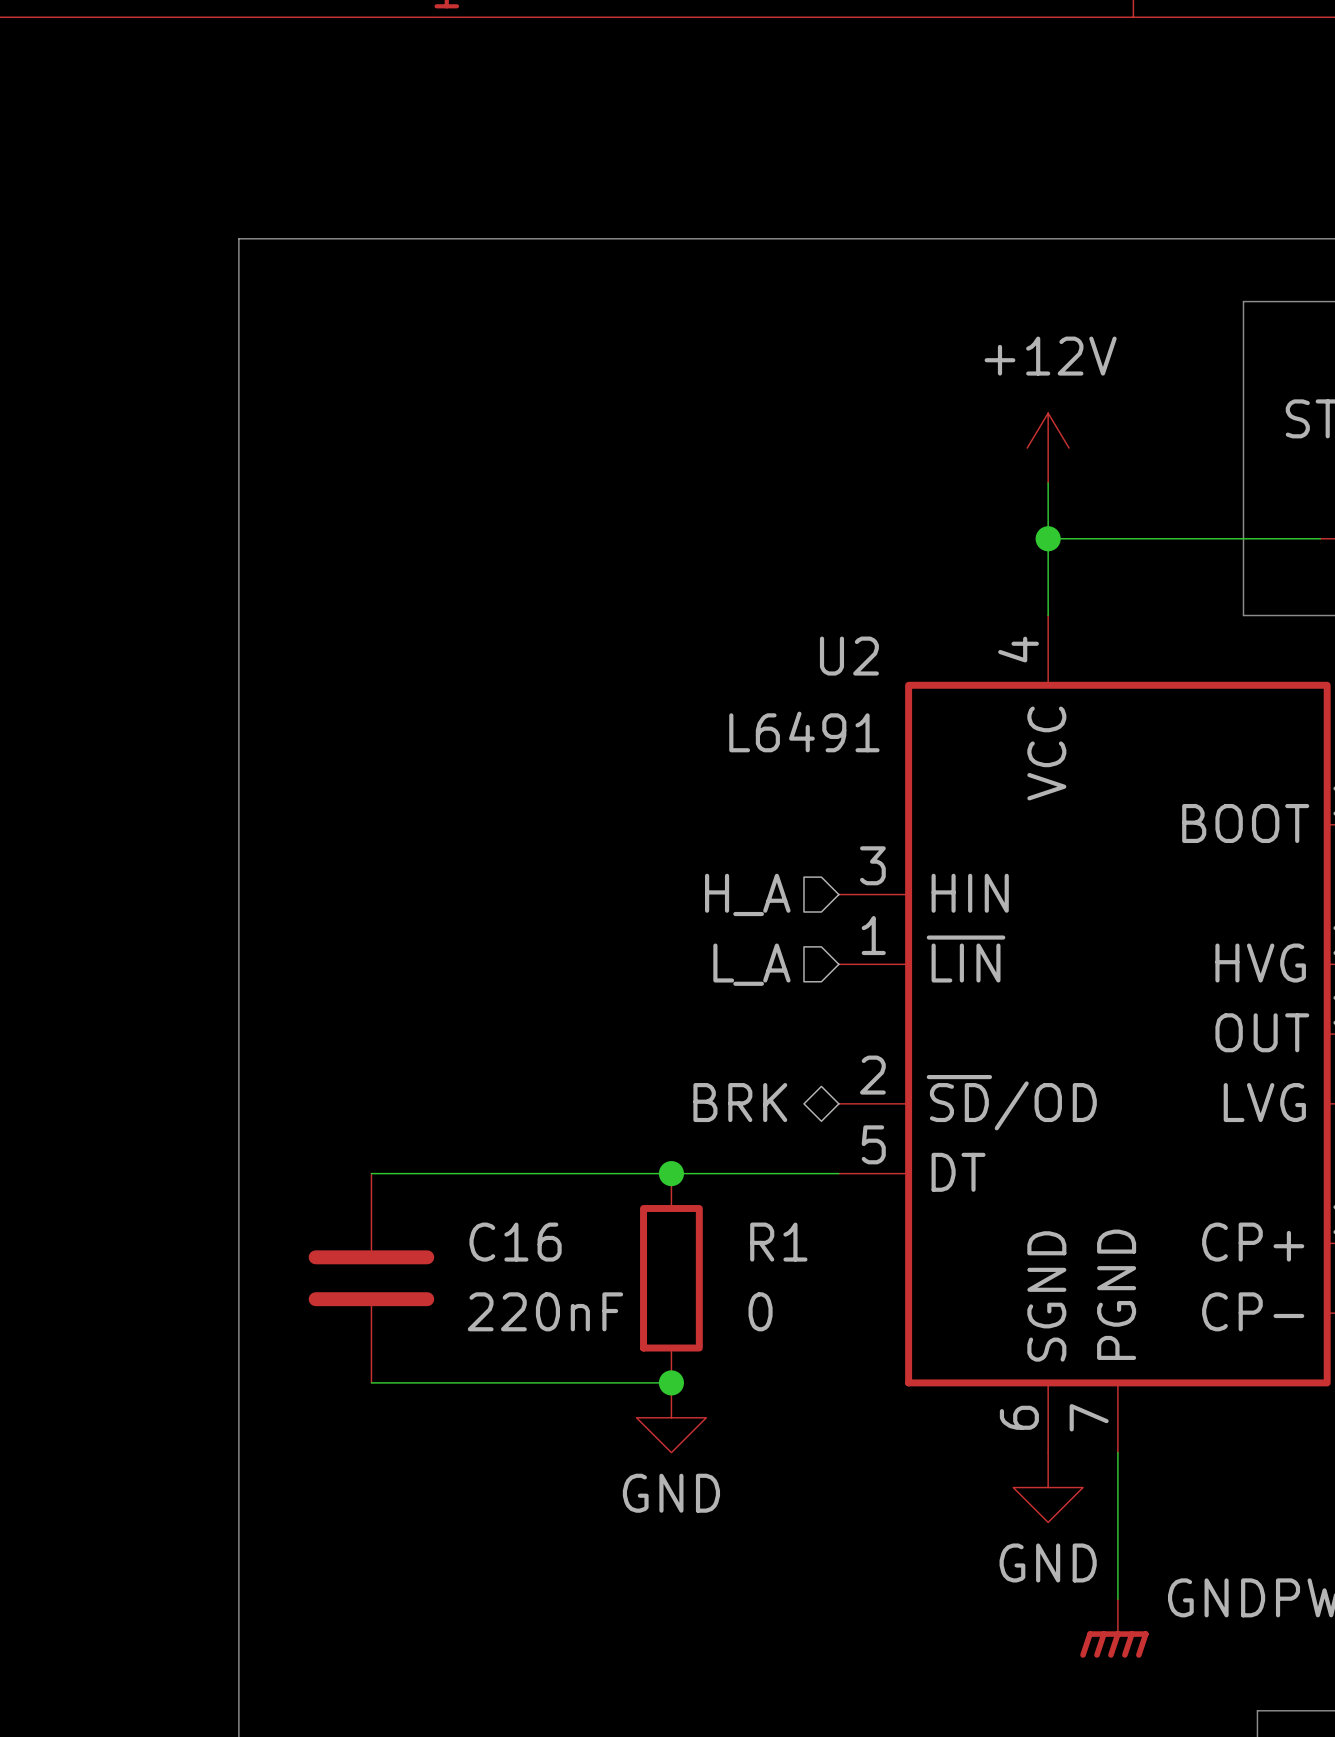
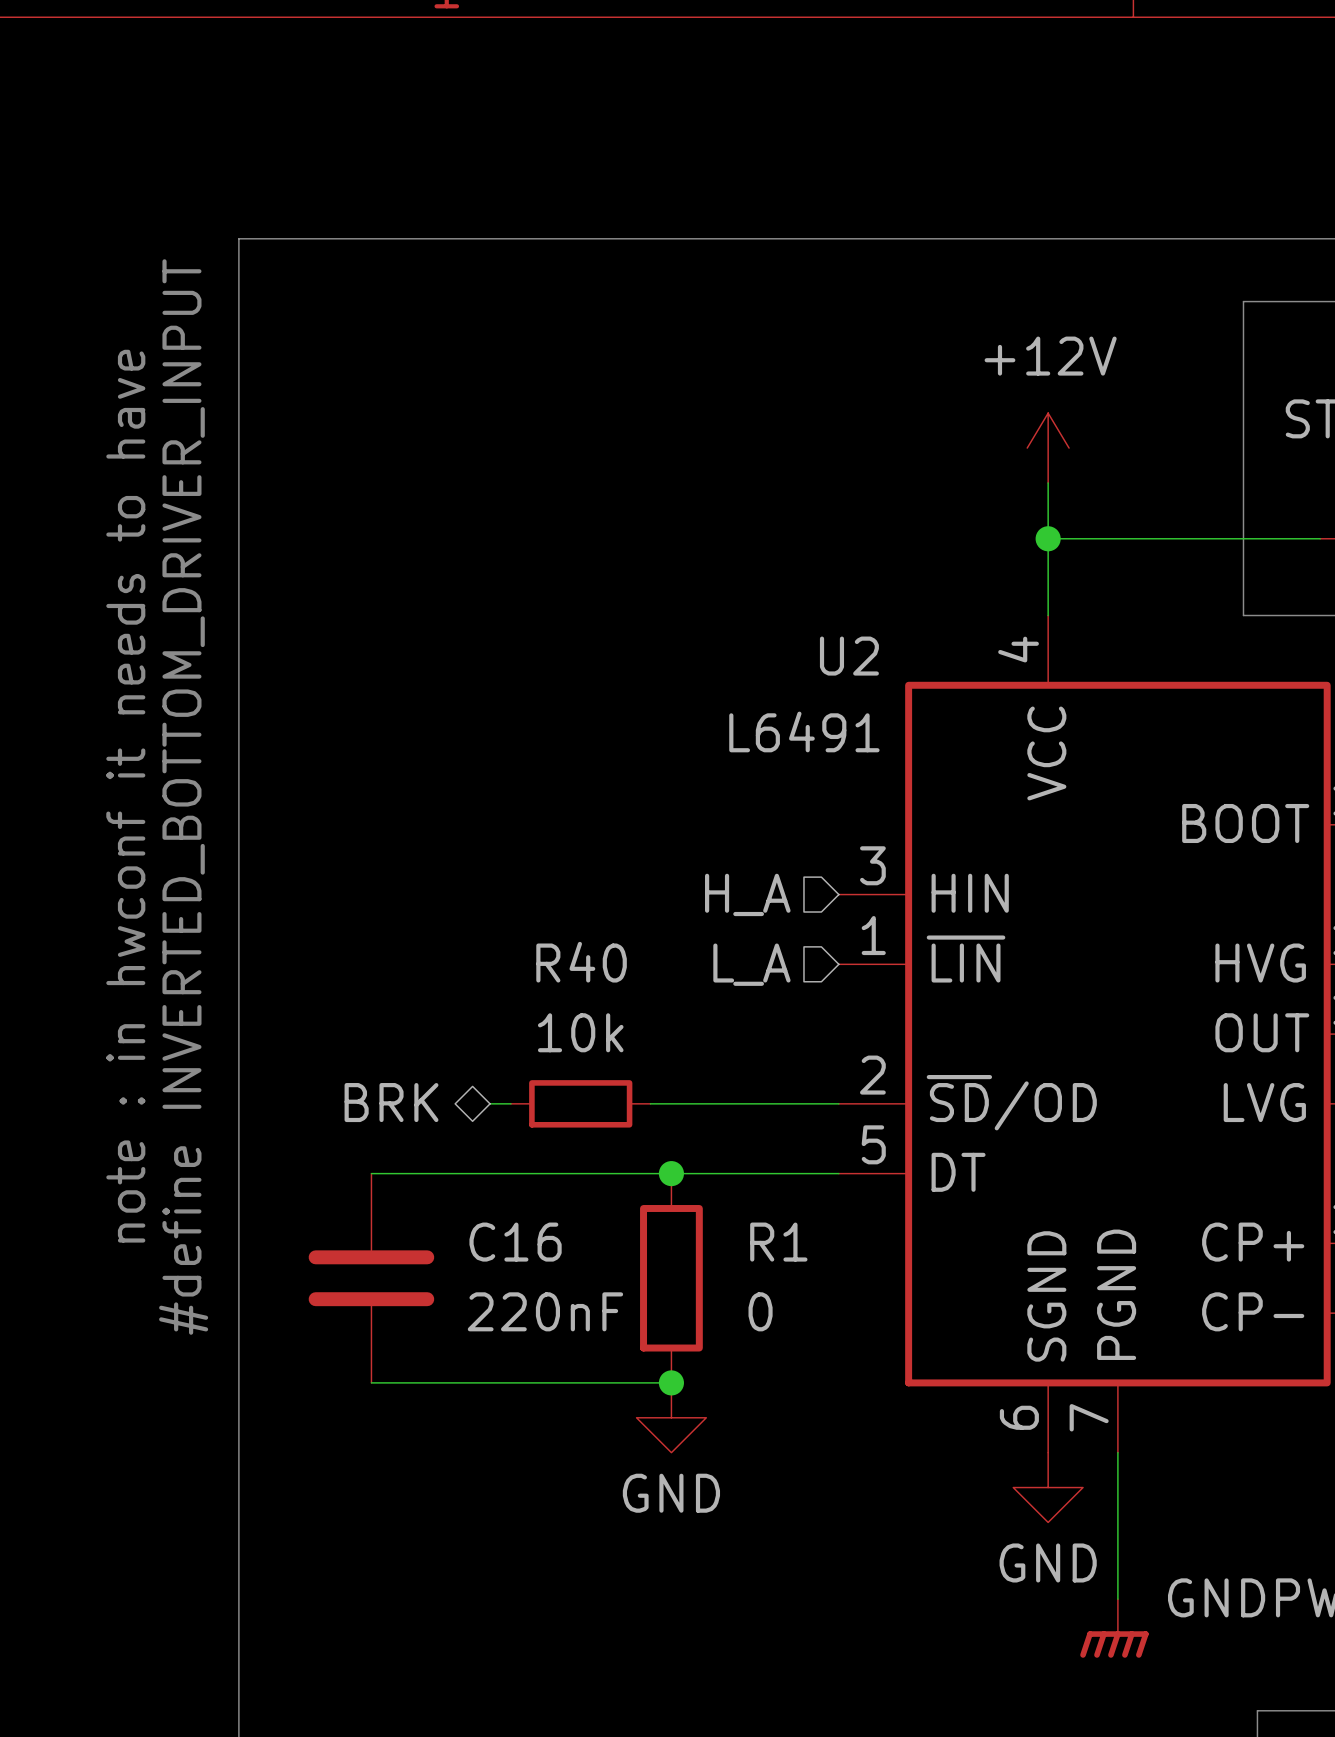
text: none -> note : in hwconf it needs to have (125, 796)
text: none -> #define INVERTED_BOTTOM_DRIVER_INPUT (183, 797)
hierarchical label position: BRK (740, 1102) -> BRK (391, 1102)
wire: none -> (490, 1103) (510, 1103)
R40: none -> 10k (580, 1103)
wire: none -> (650, 1103) (838, 1103)

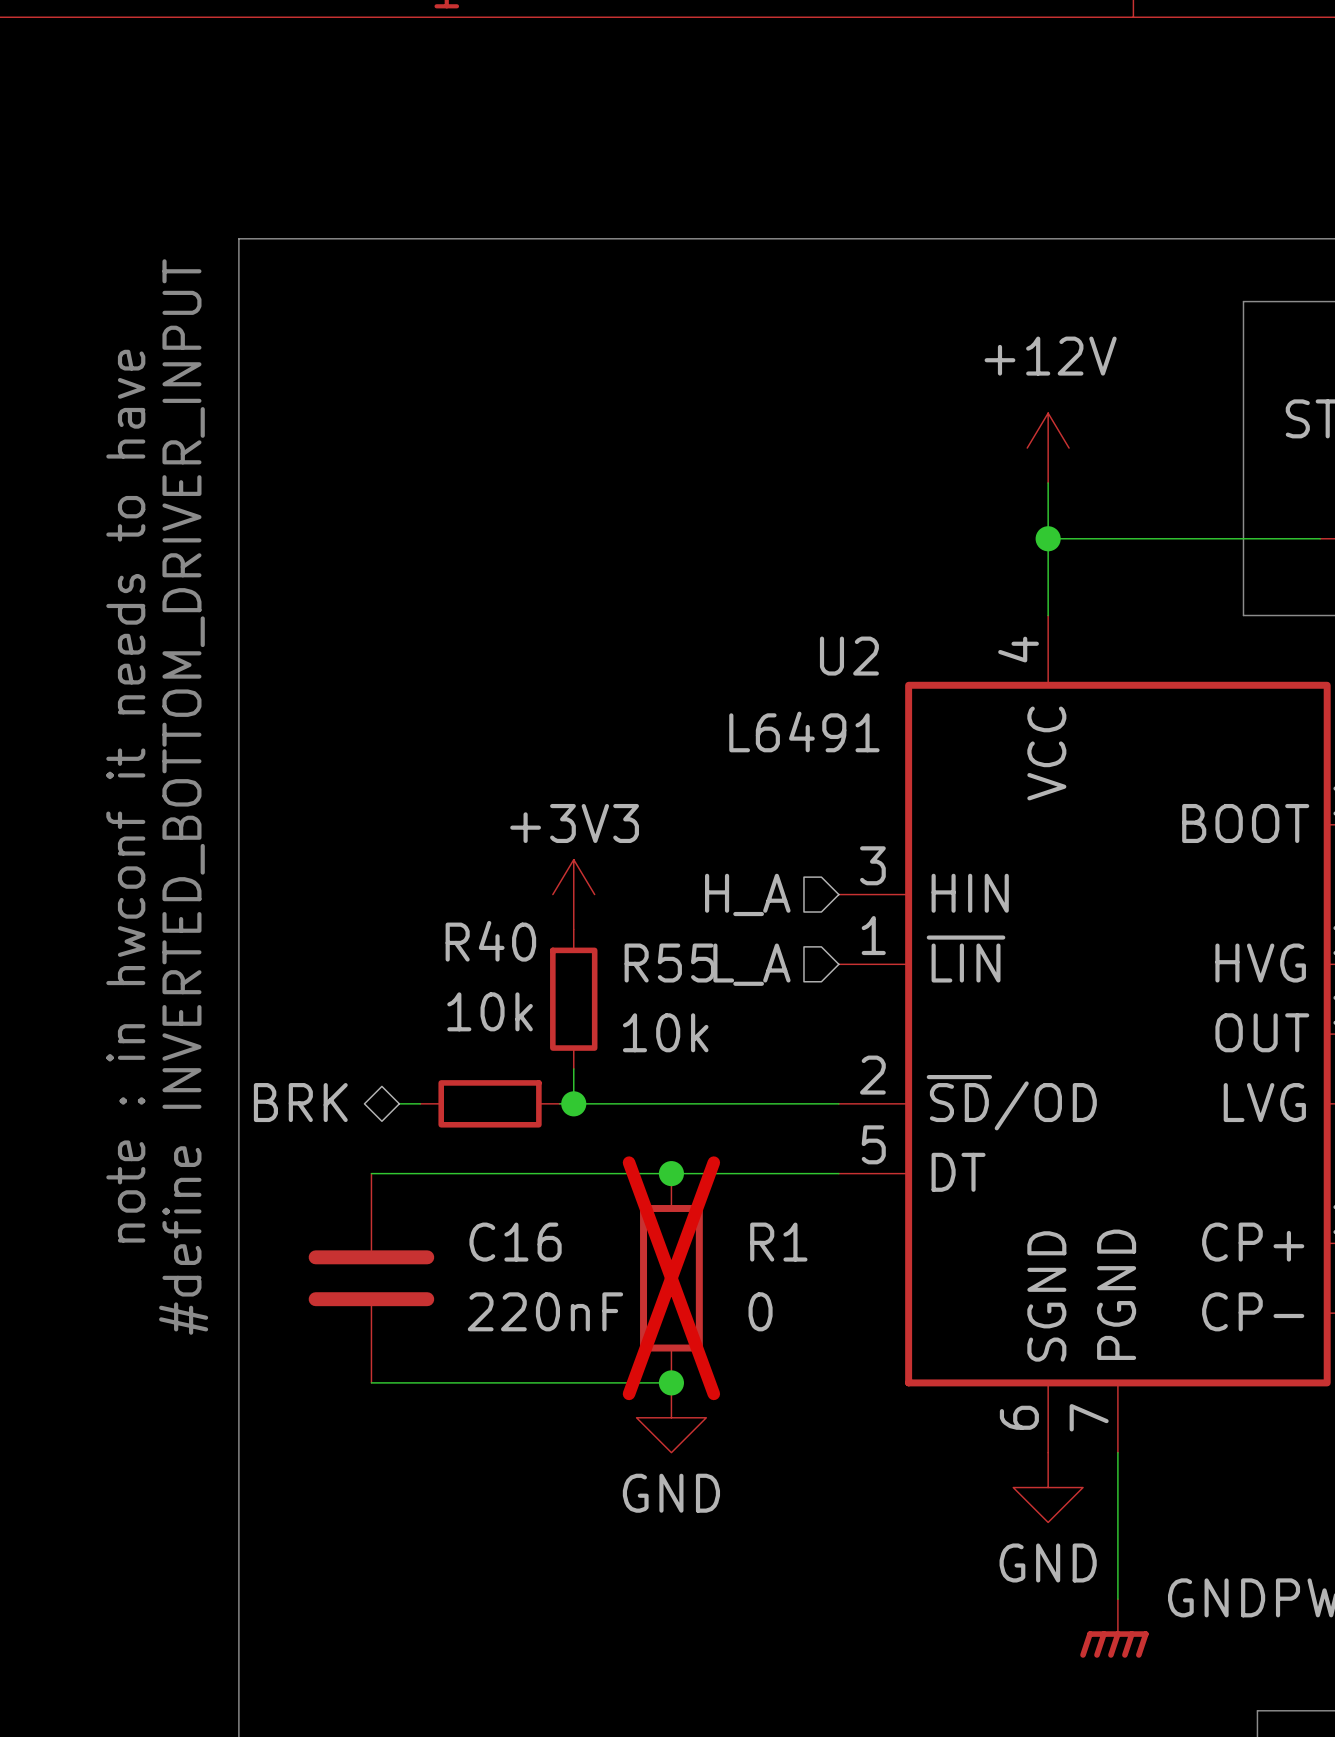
power symbol: none -> +3V3 (573, 894)
R40 name position: R40 (581, 962) -> R40 (490, 941)
R55: none -> 10k (573, 999)
R40 value position: 10k (580, 1032) -> 10k (490, 1011)
wire: none -> (573, 1068) (573, 1103)
hierarchical label position: BRK (391, 1102) -> BRK (300, 1102)
wire: (490, 1103) (510, 1103) -> (399, 1103) (420, 1103)
wire: none -> (559, 1103) (650, 1103)
junction: none -> (573, 1103)
R40 position: (580, 1103) -> (490, 1103)
R1 do-not-place cross: none -> (671, 1278)

